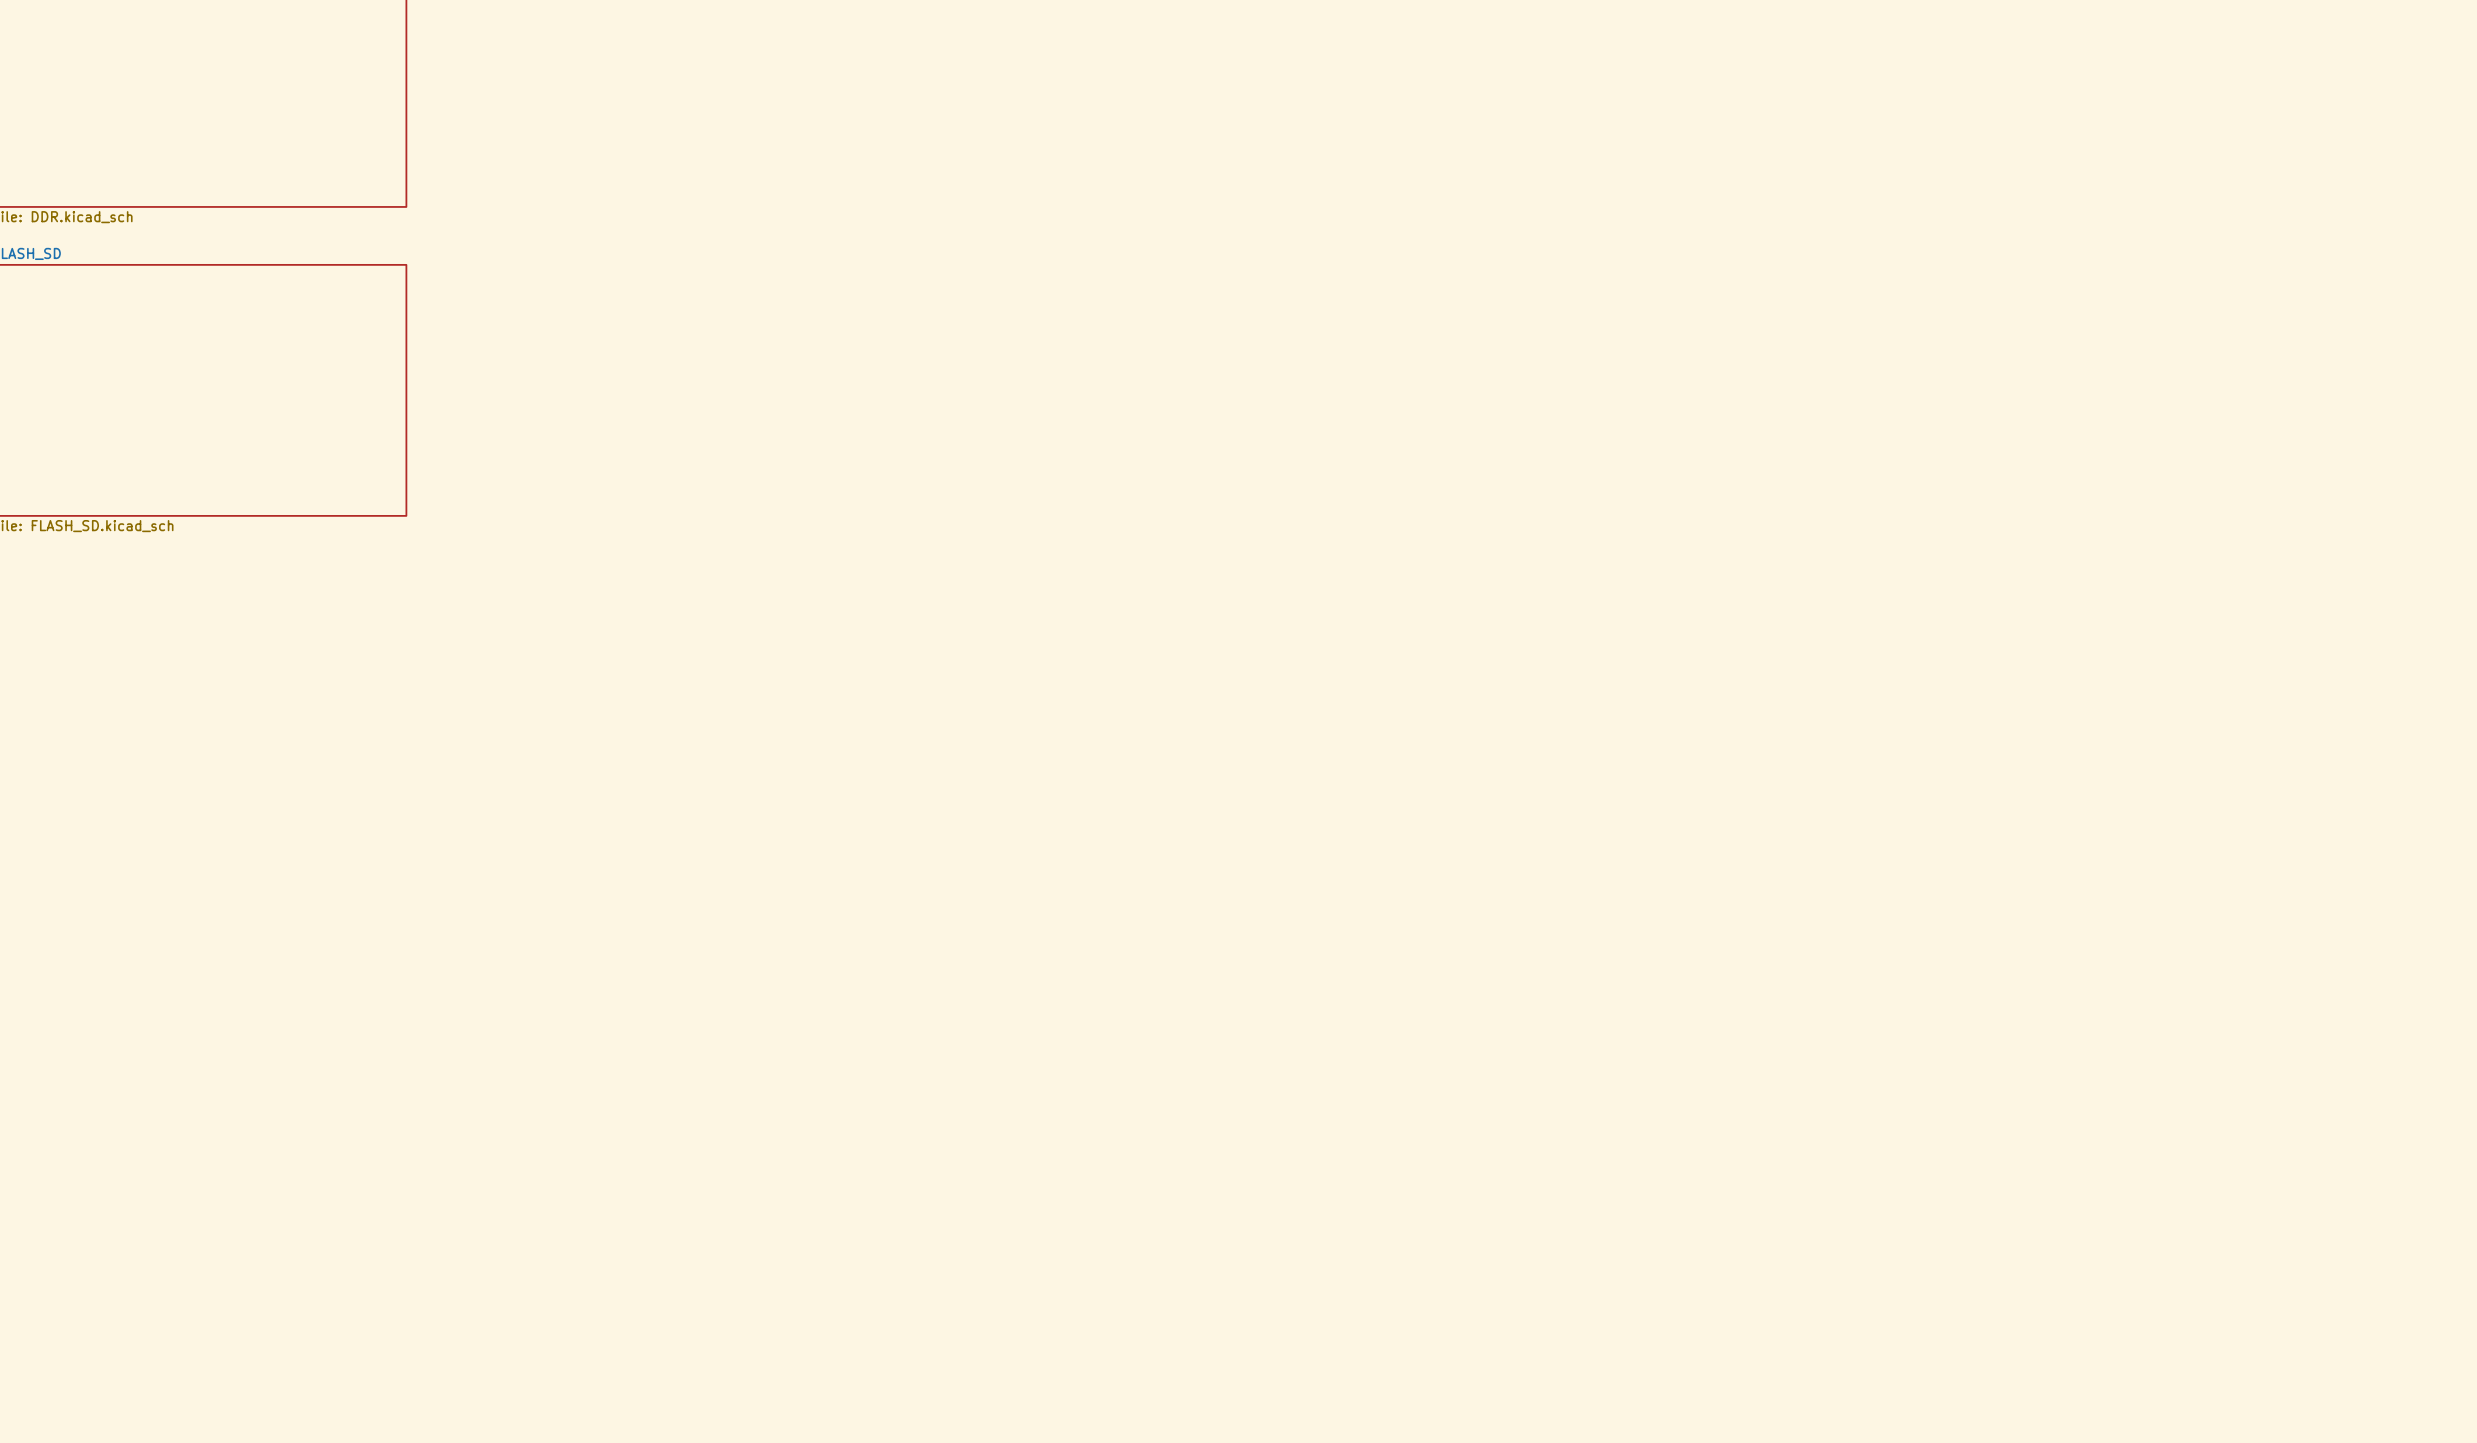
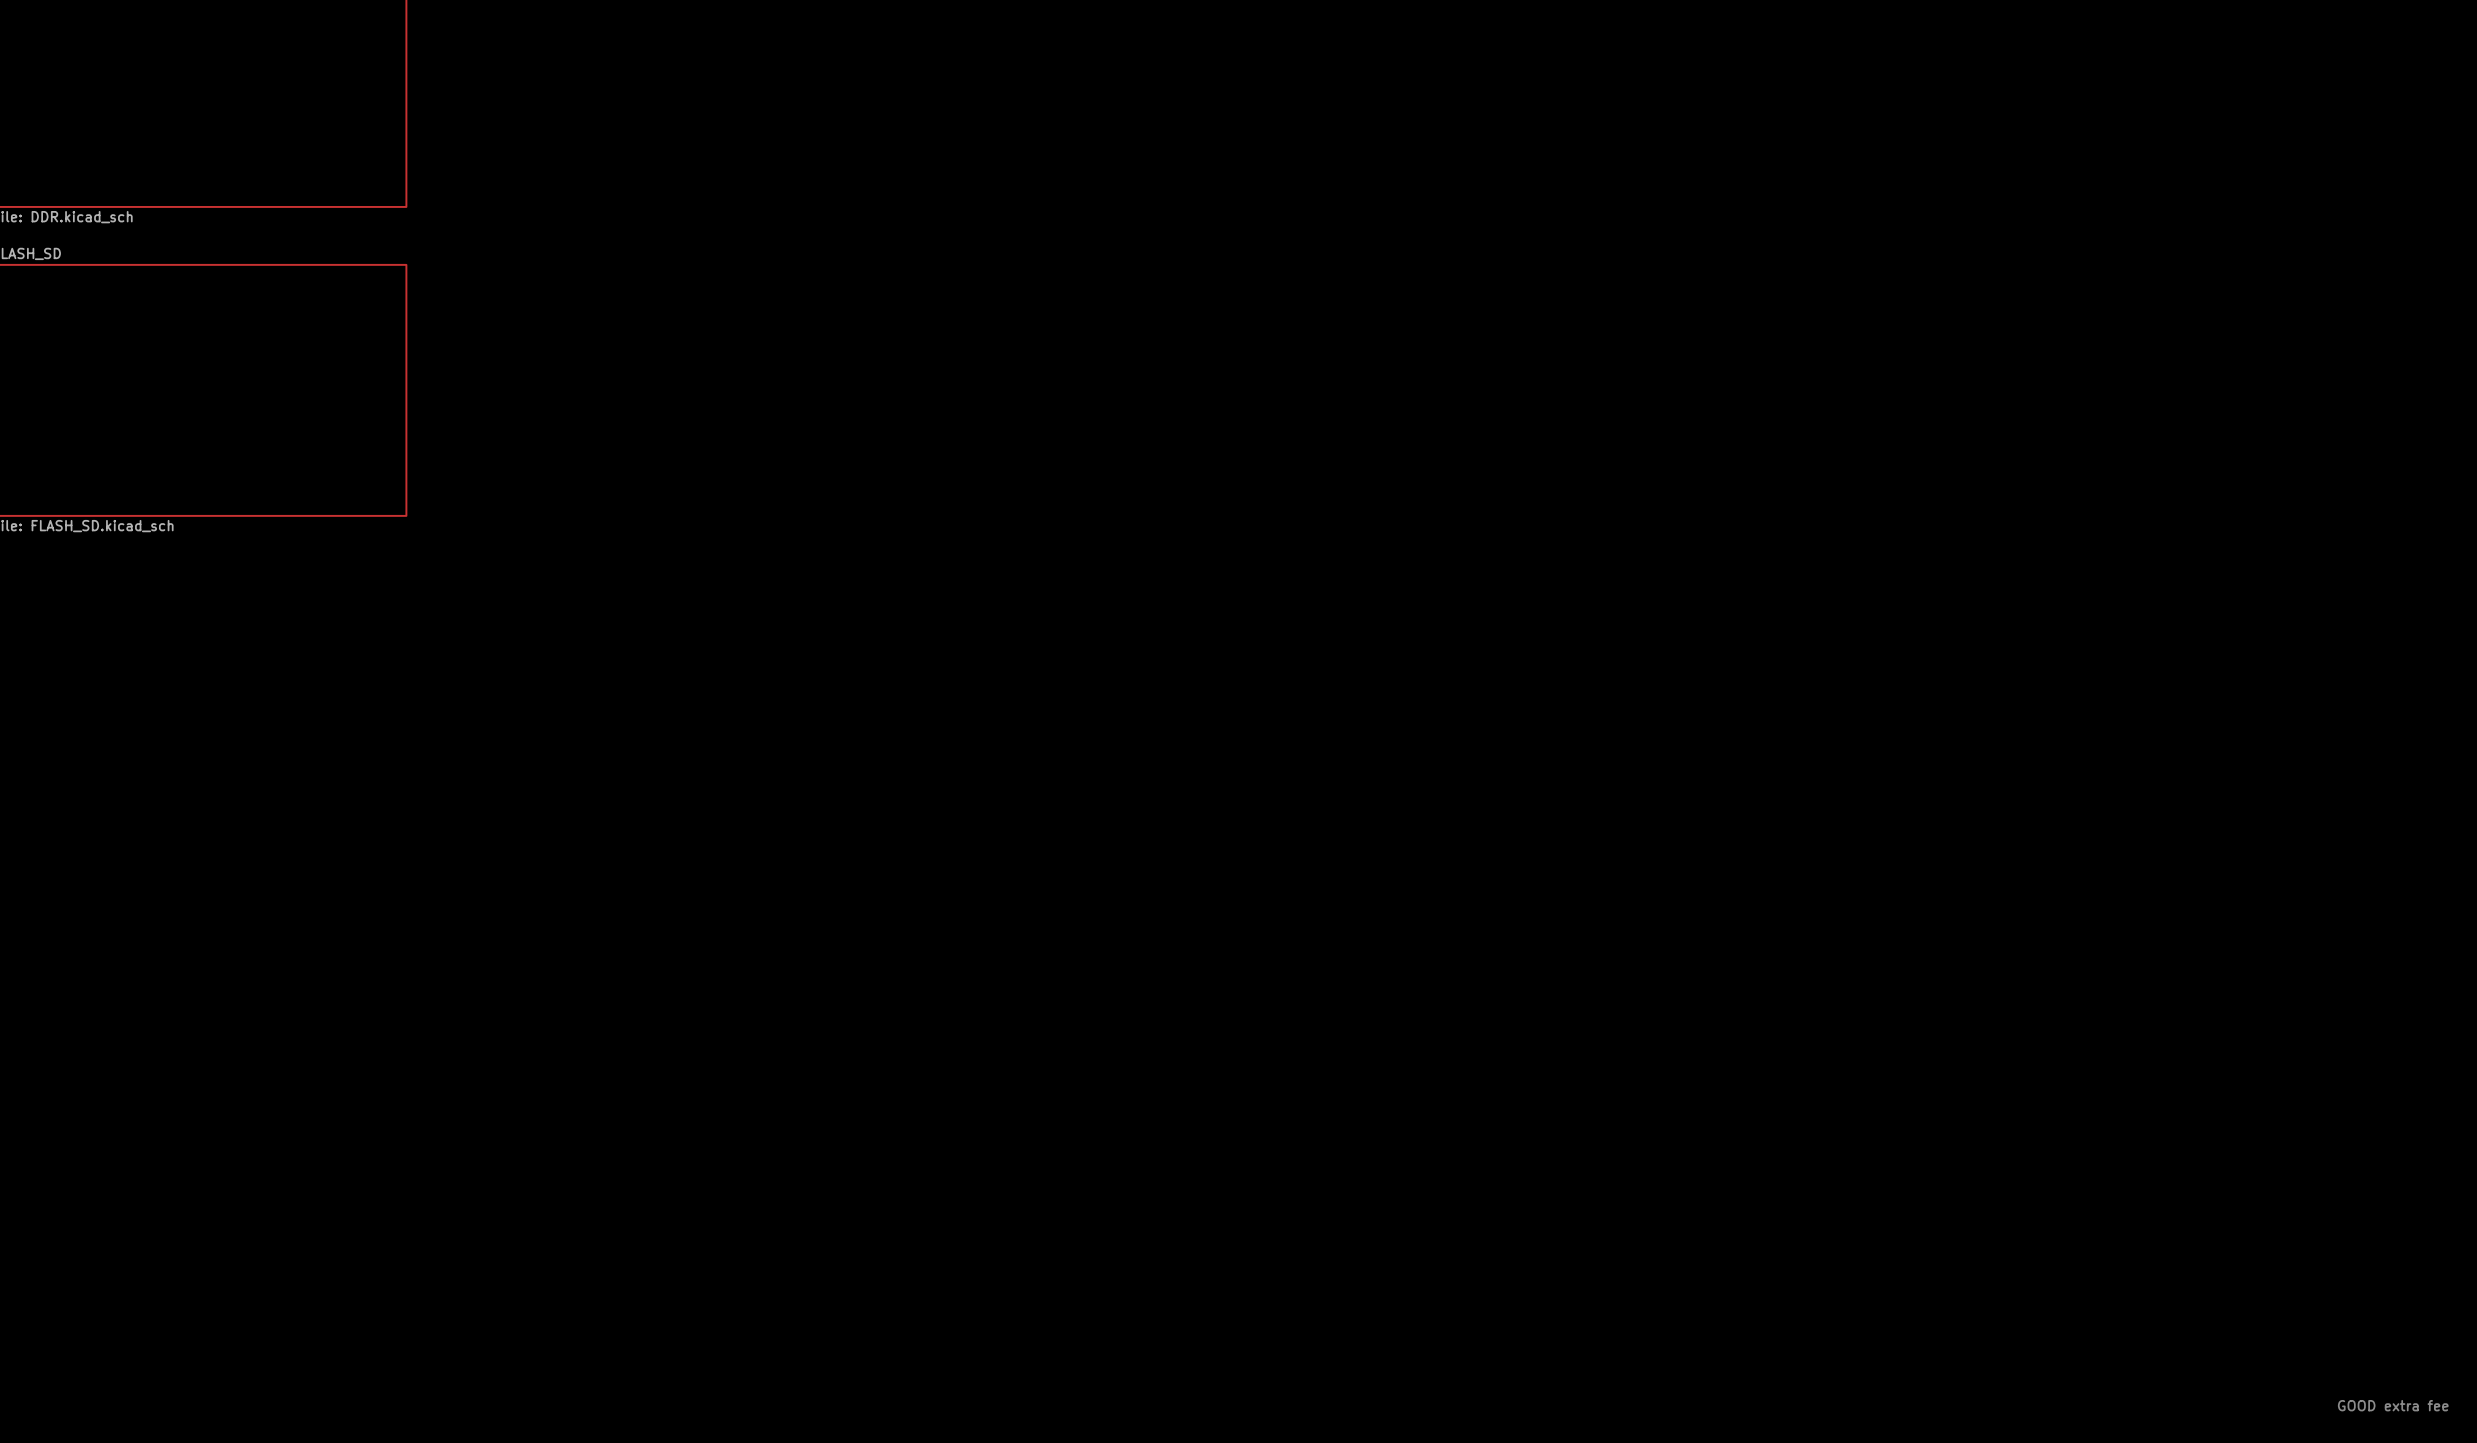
text: none -> GOOD extra fee (2393, 1405)

